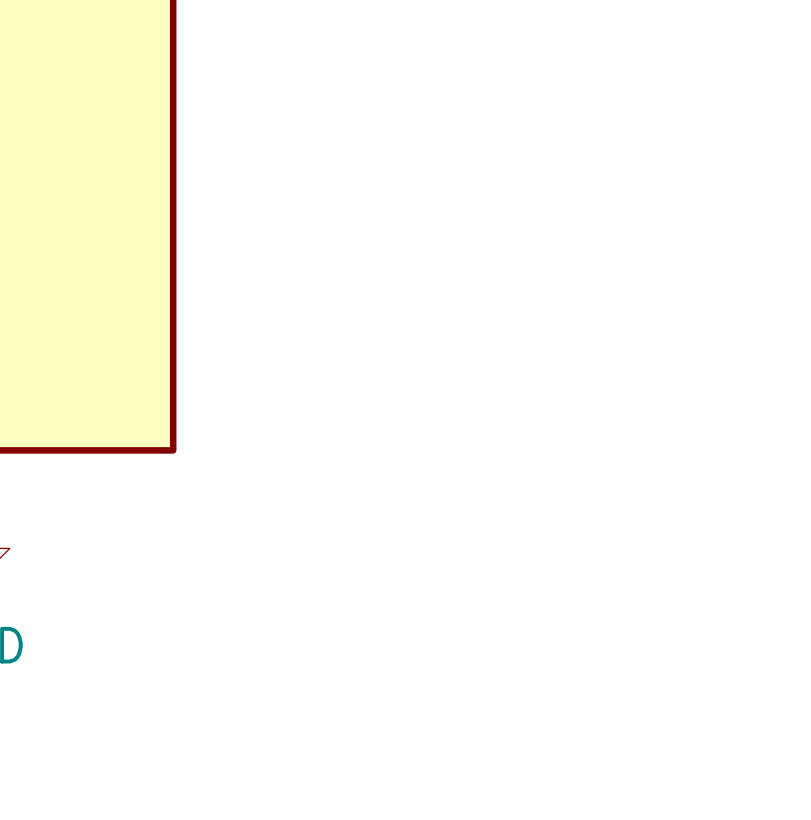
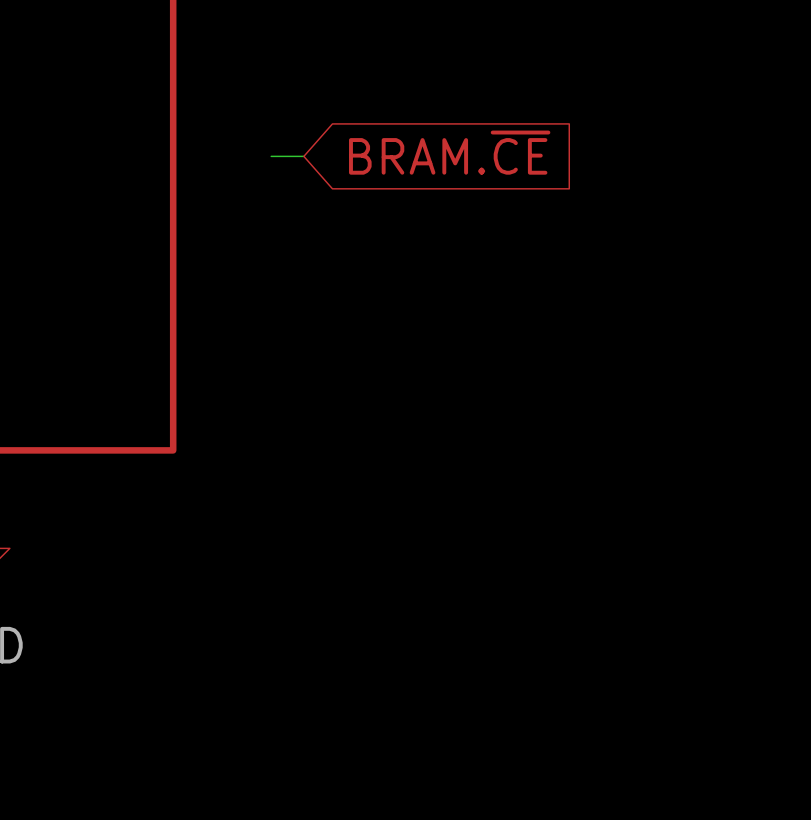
global label: none -> BRAM.~{CE} (449, 152)
wire: none -> (271, 156) (303, 156)

